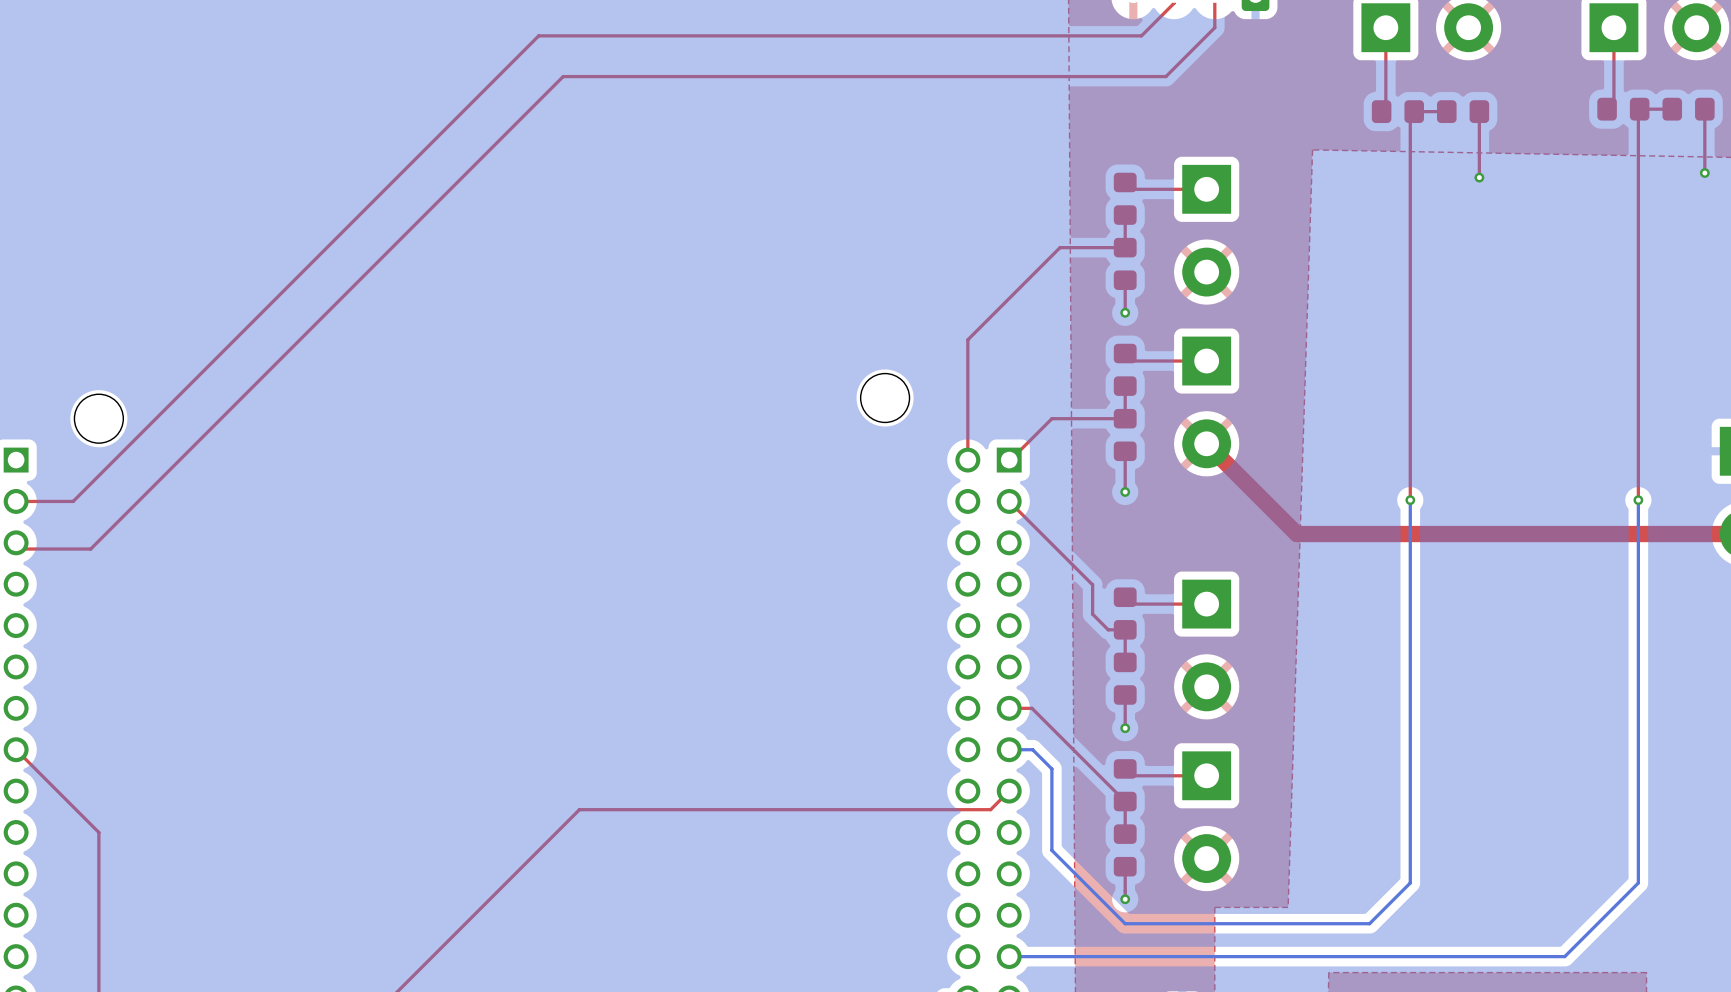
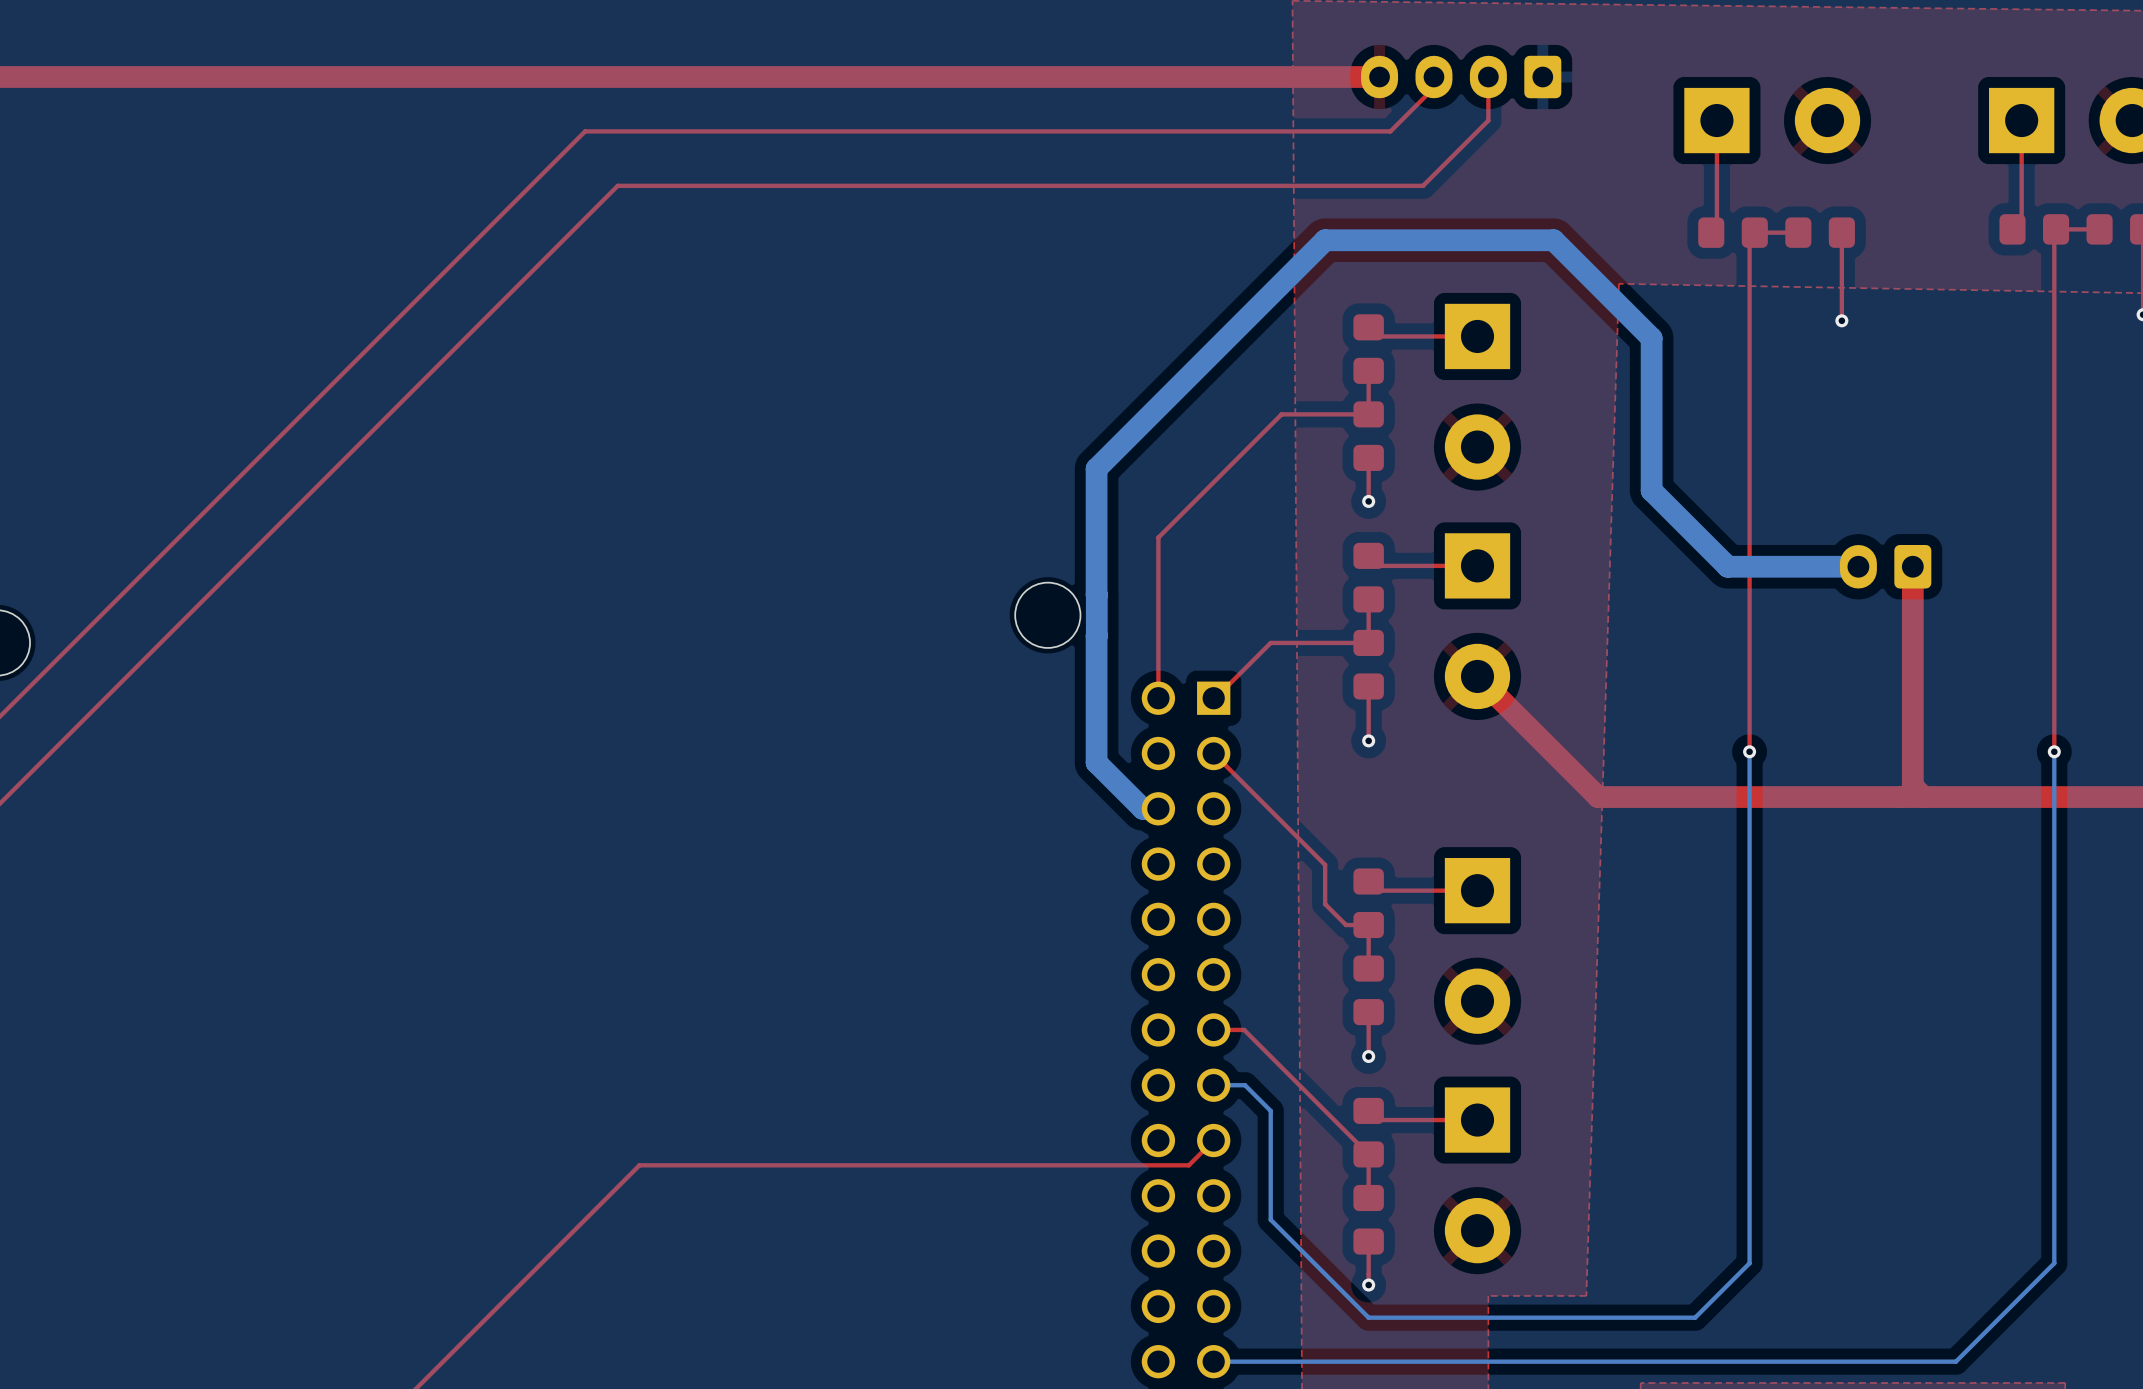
bottom track: none -> (1858, 566) (1727, 566) (1651, 490) (1651, 338) (1553, 240) (1325, 240) (1096, 468) (1096, 594)
part: none -> (1885, 566)
top track: none -> (1912, 566) (1912, 786) (1923, 797)
bottom track: none -> (1096, 595) (1096, 635)
bottom track: none -> (1096, 635) (1096, 762) (1142, 808) (1158, 808)

